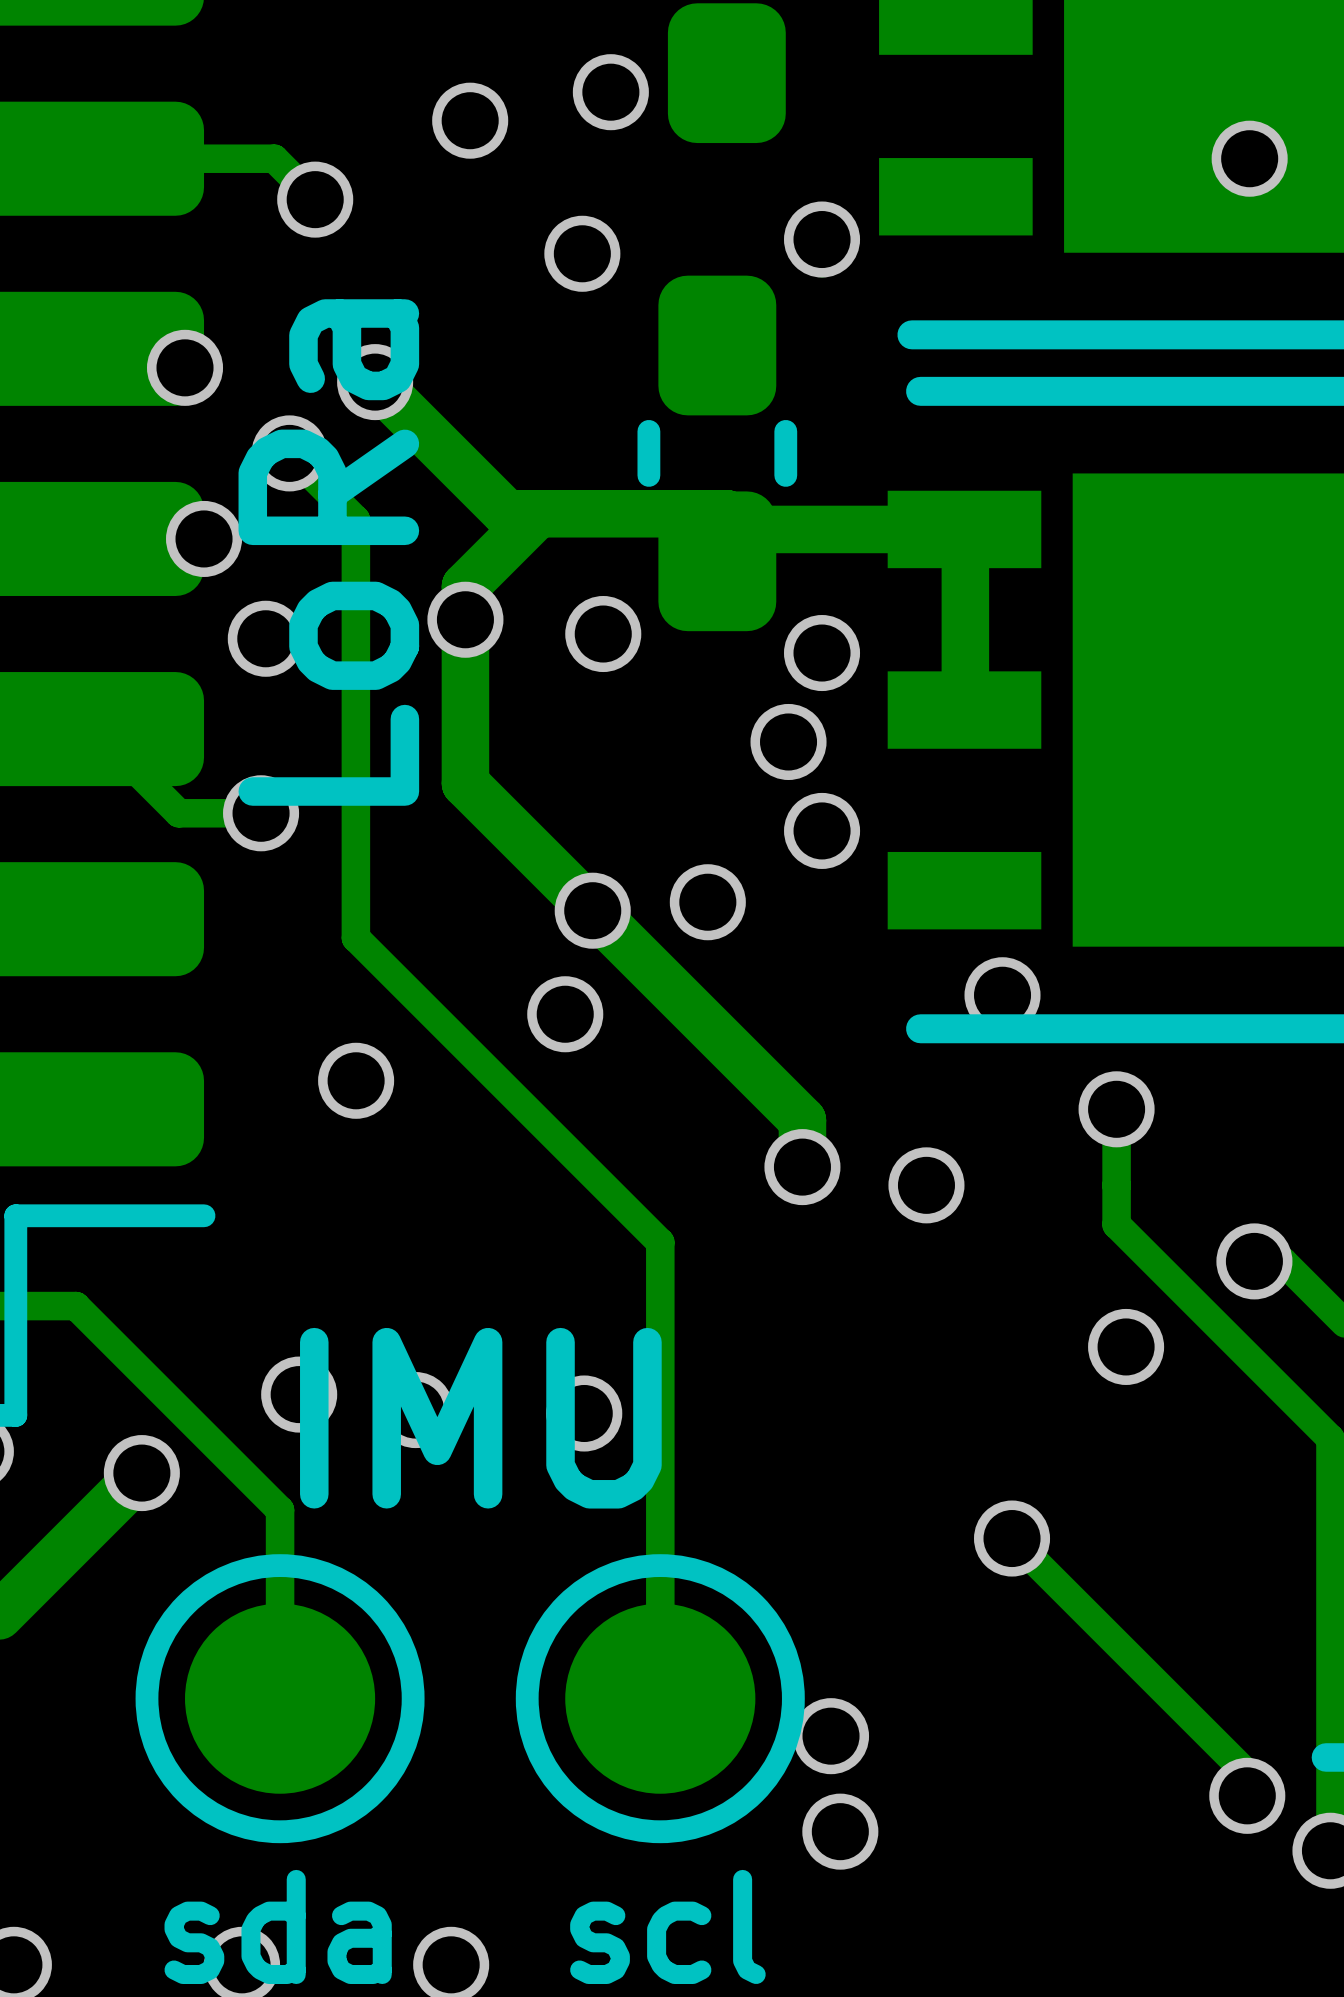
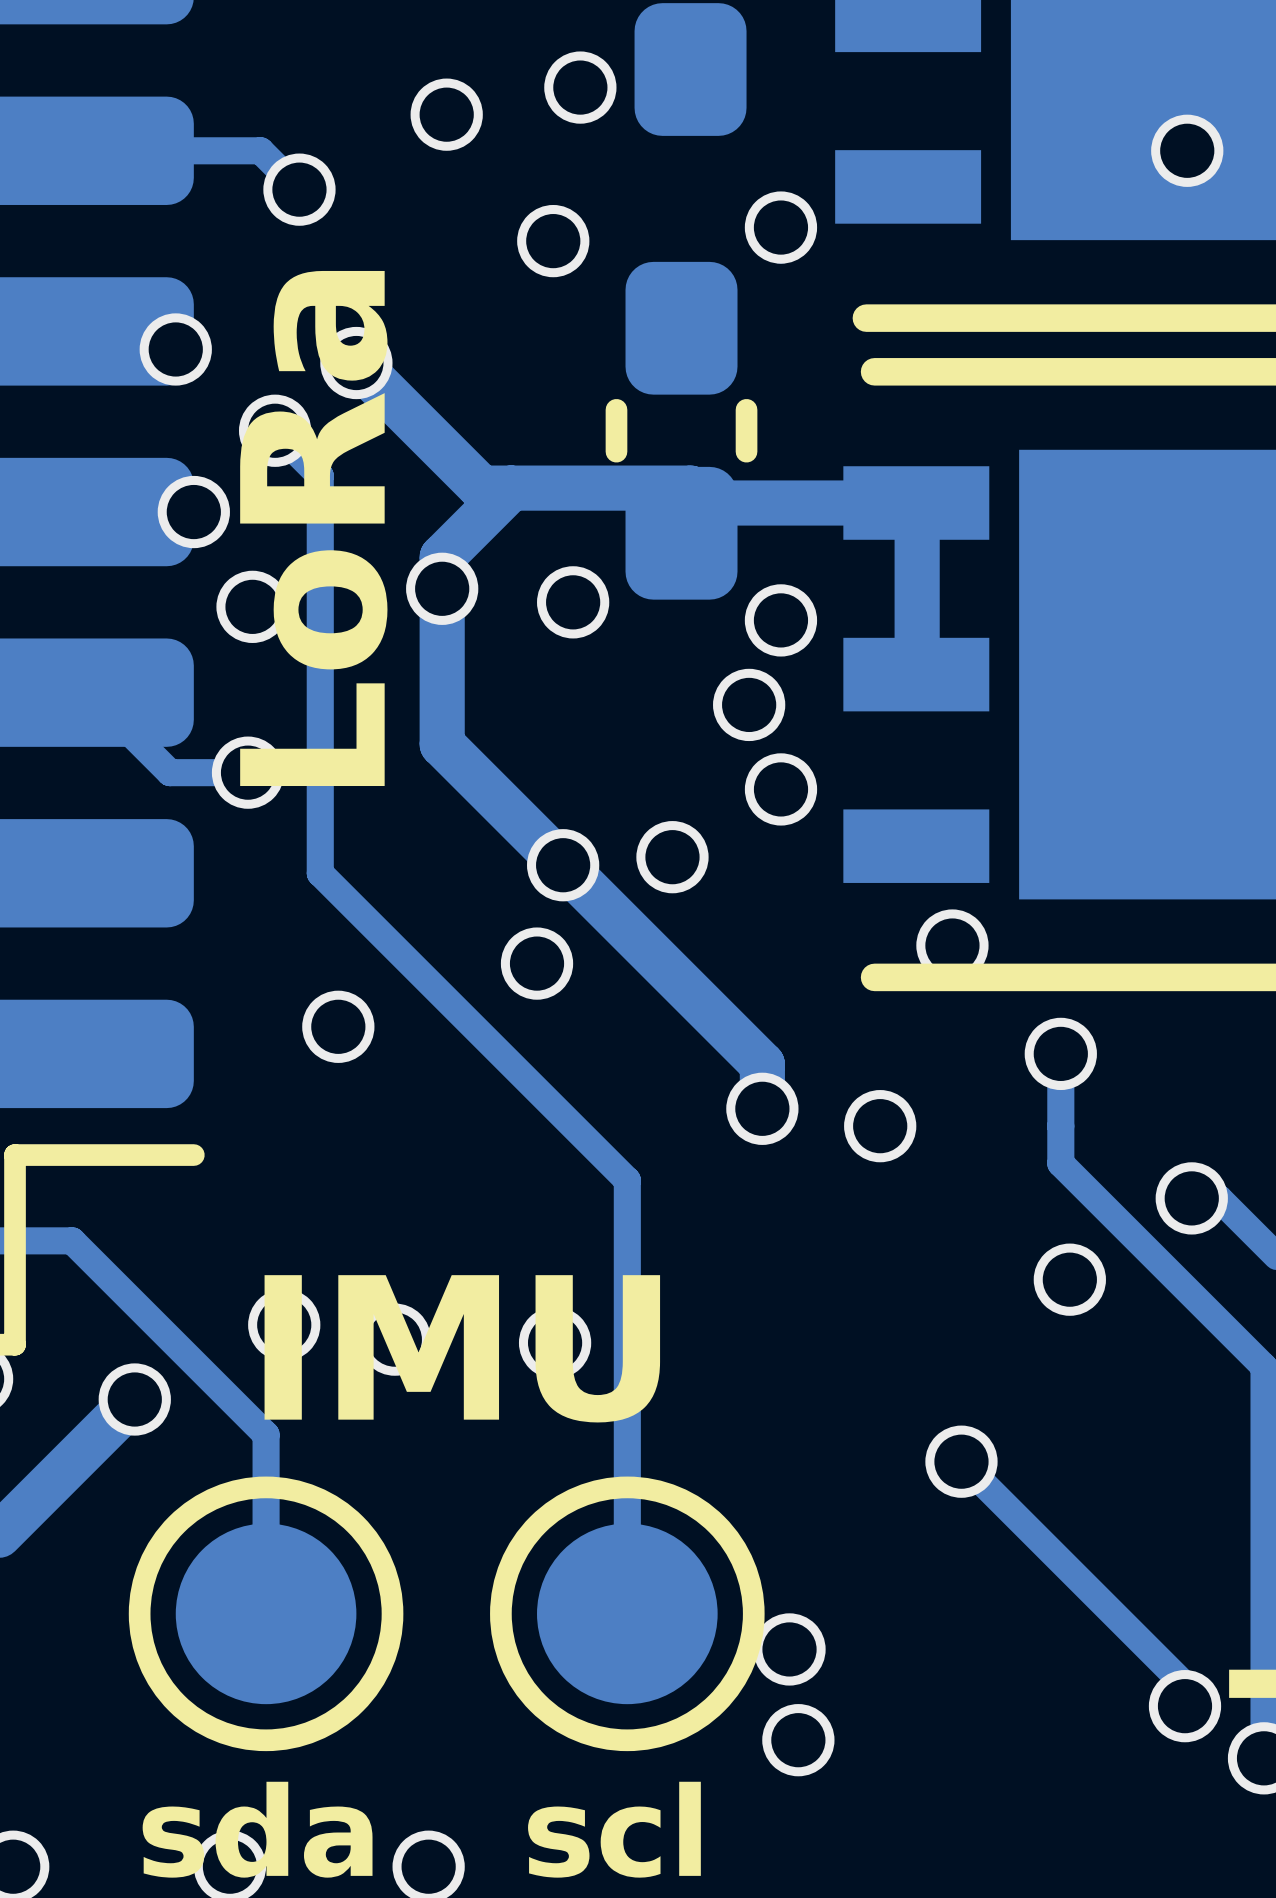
track: (337, 500) (355, 519) (355, 937) -> (320, 475) (320, 873) (338, 891)

